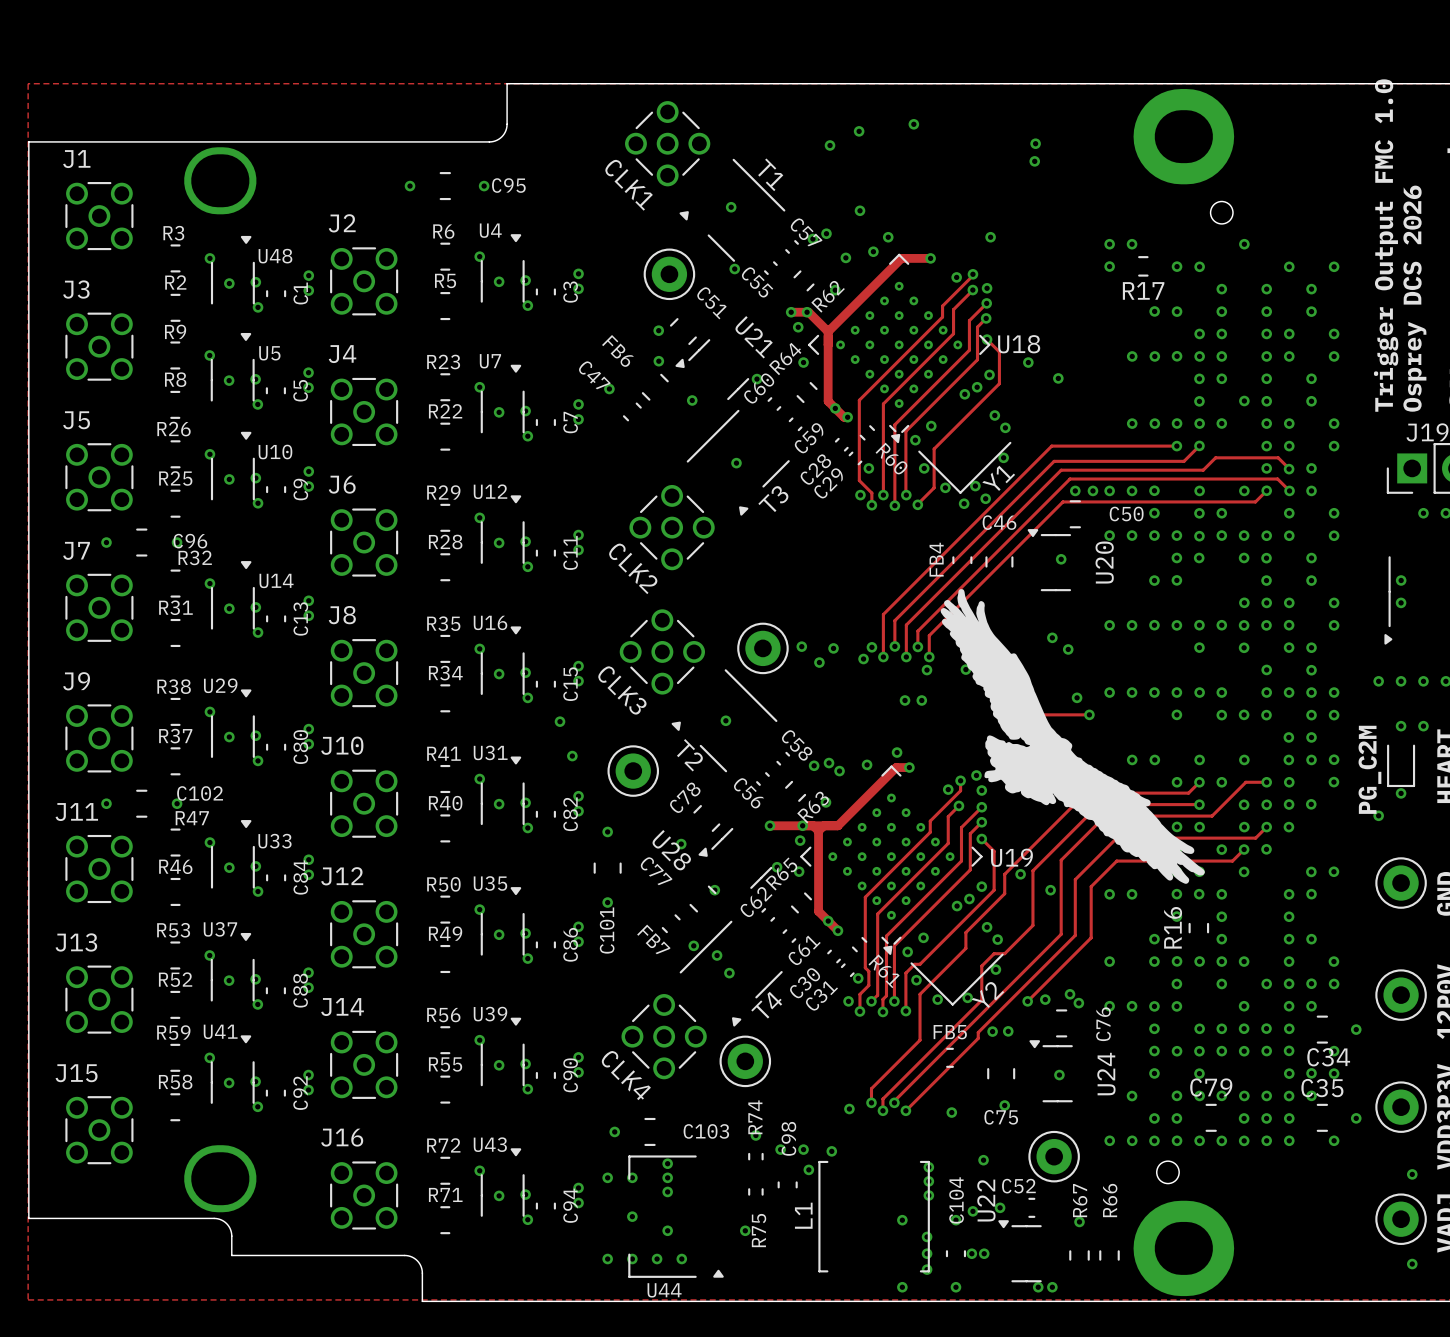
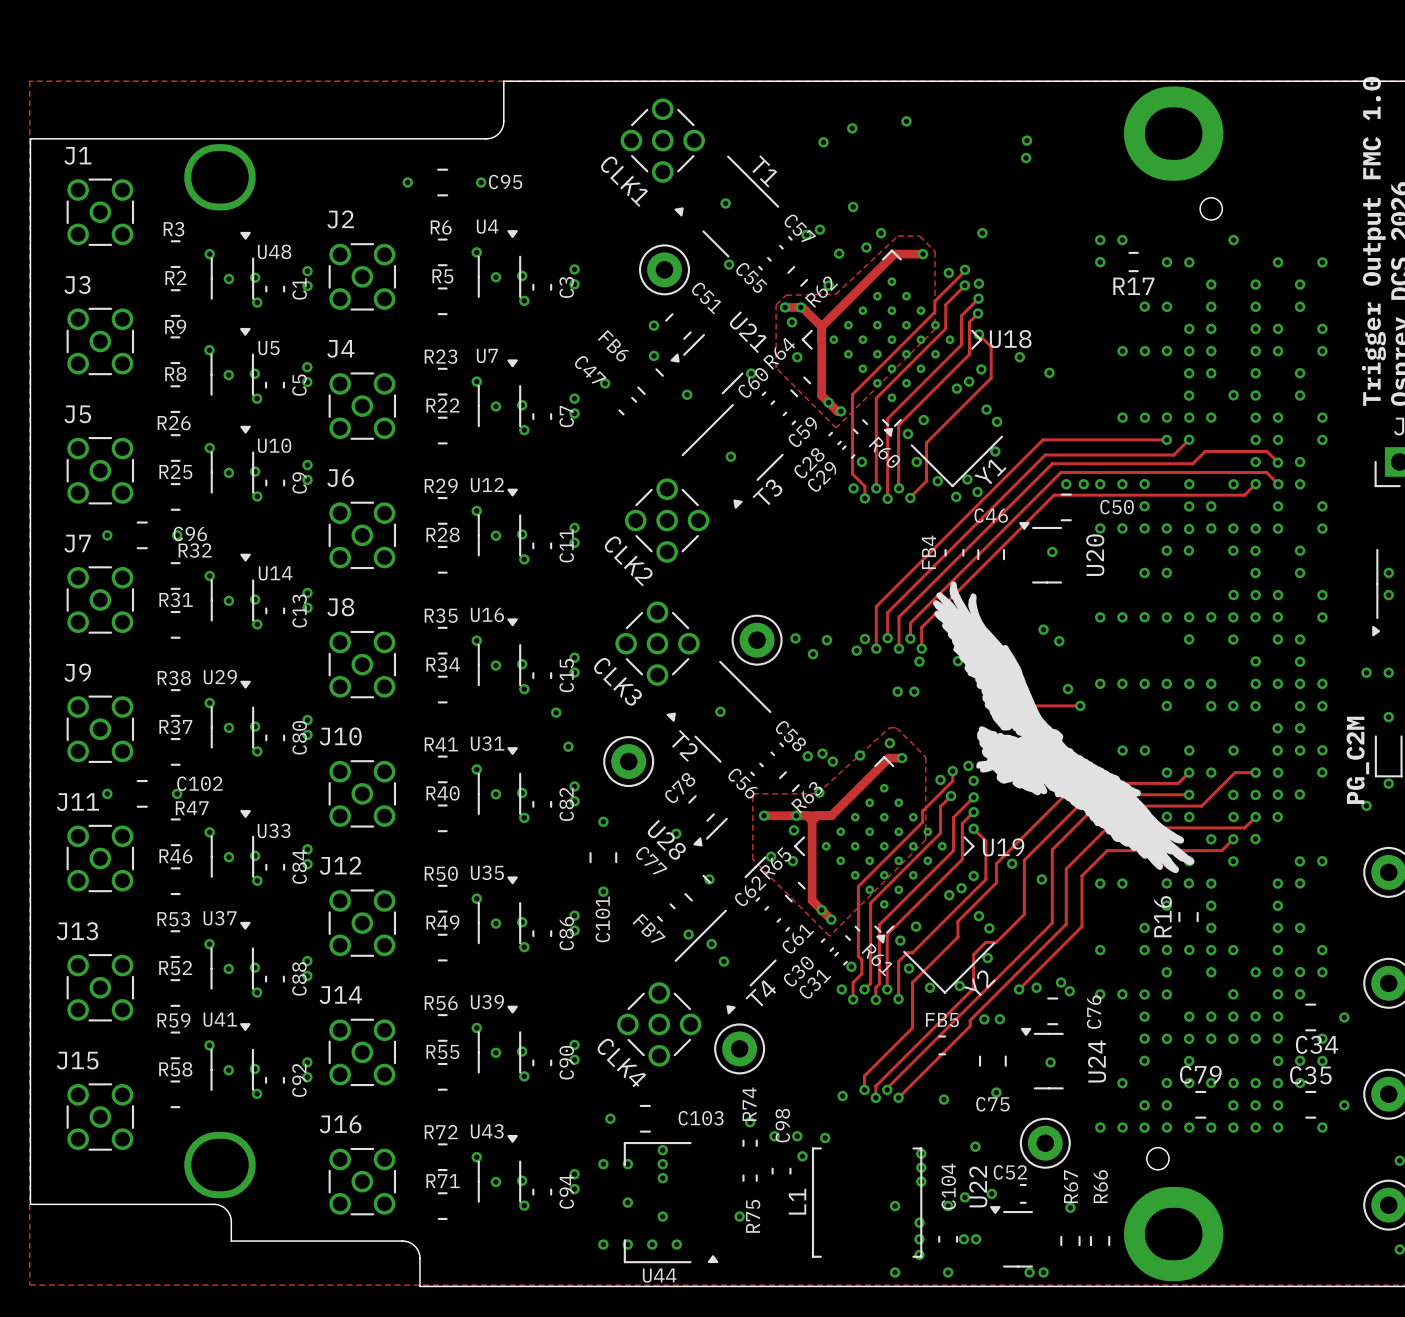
zone outline: none -> (897, 236) (835, 294) (786, 295) (776, 304) (776, 367) (836, 428) (935, 329) (935, 251) (919, 236) (897, 236)
zone outline: none -> (889, 727) (817, 793) (752, 793) (752, 859) (829, 936) (925, 840) (925, 757) (896, 727) (889, 727)

